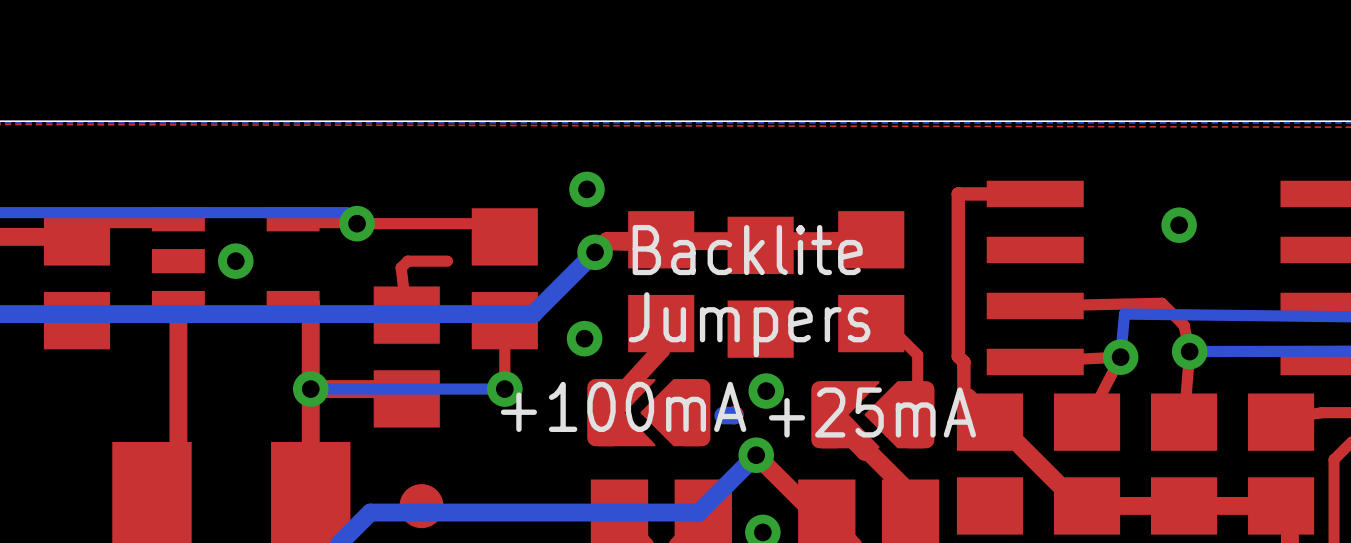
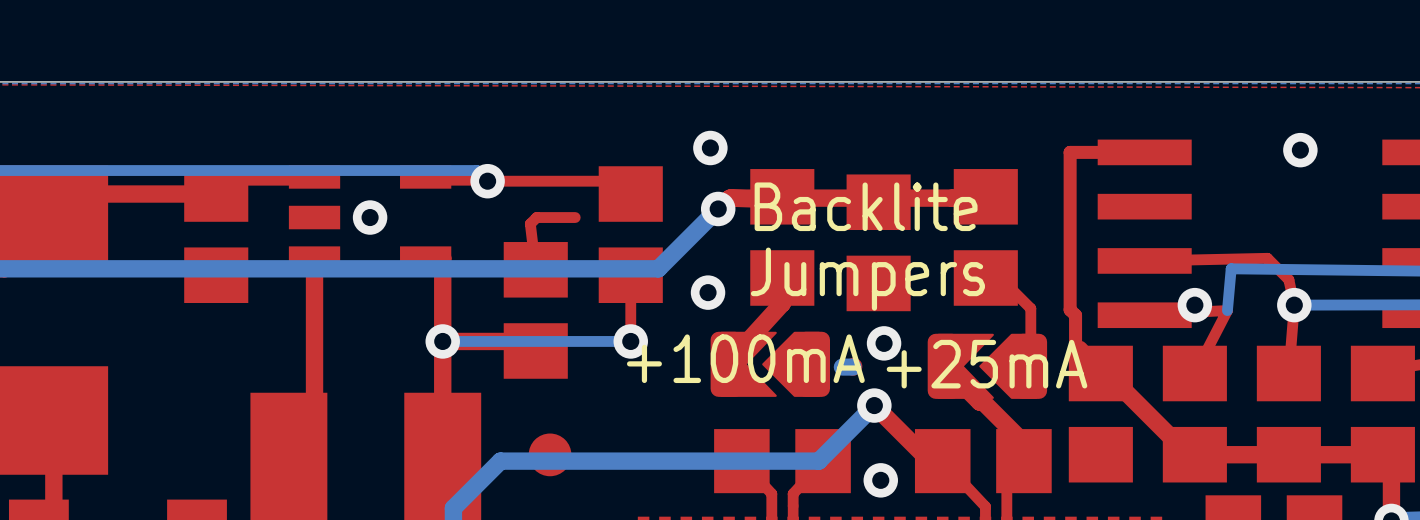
via position: (1179, 225) -> (1300, 150)
via position: (1120, 357) -> (1194, 305)

